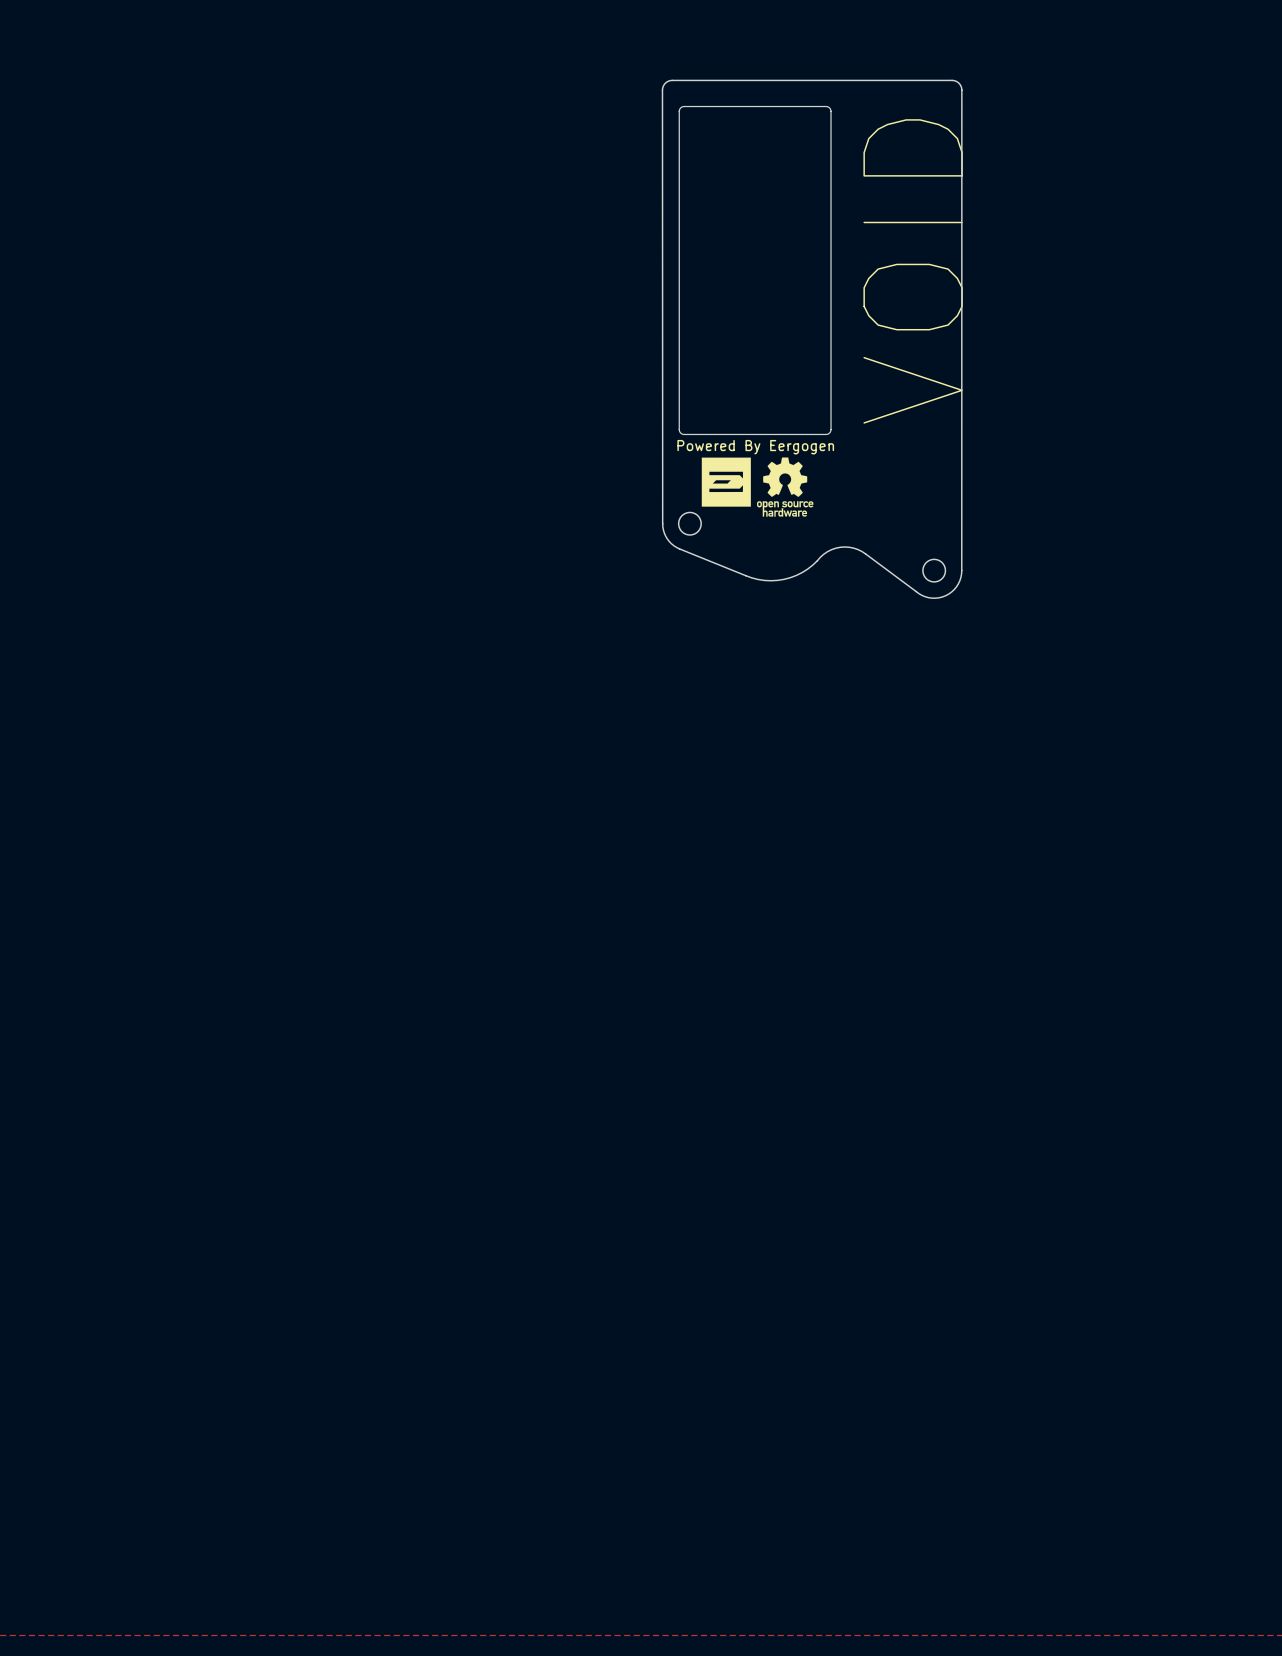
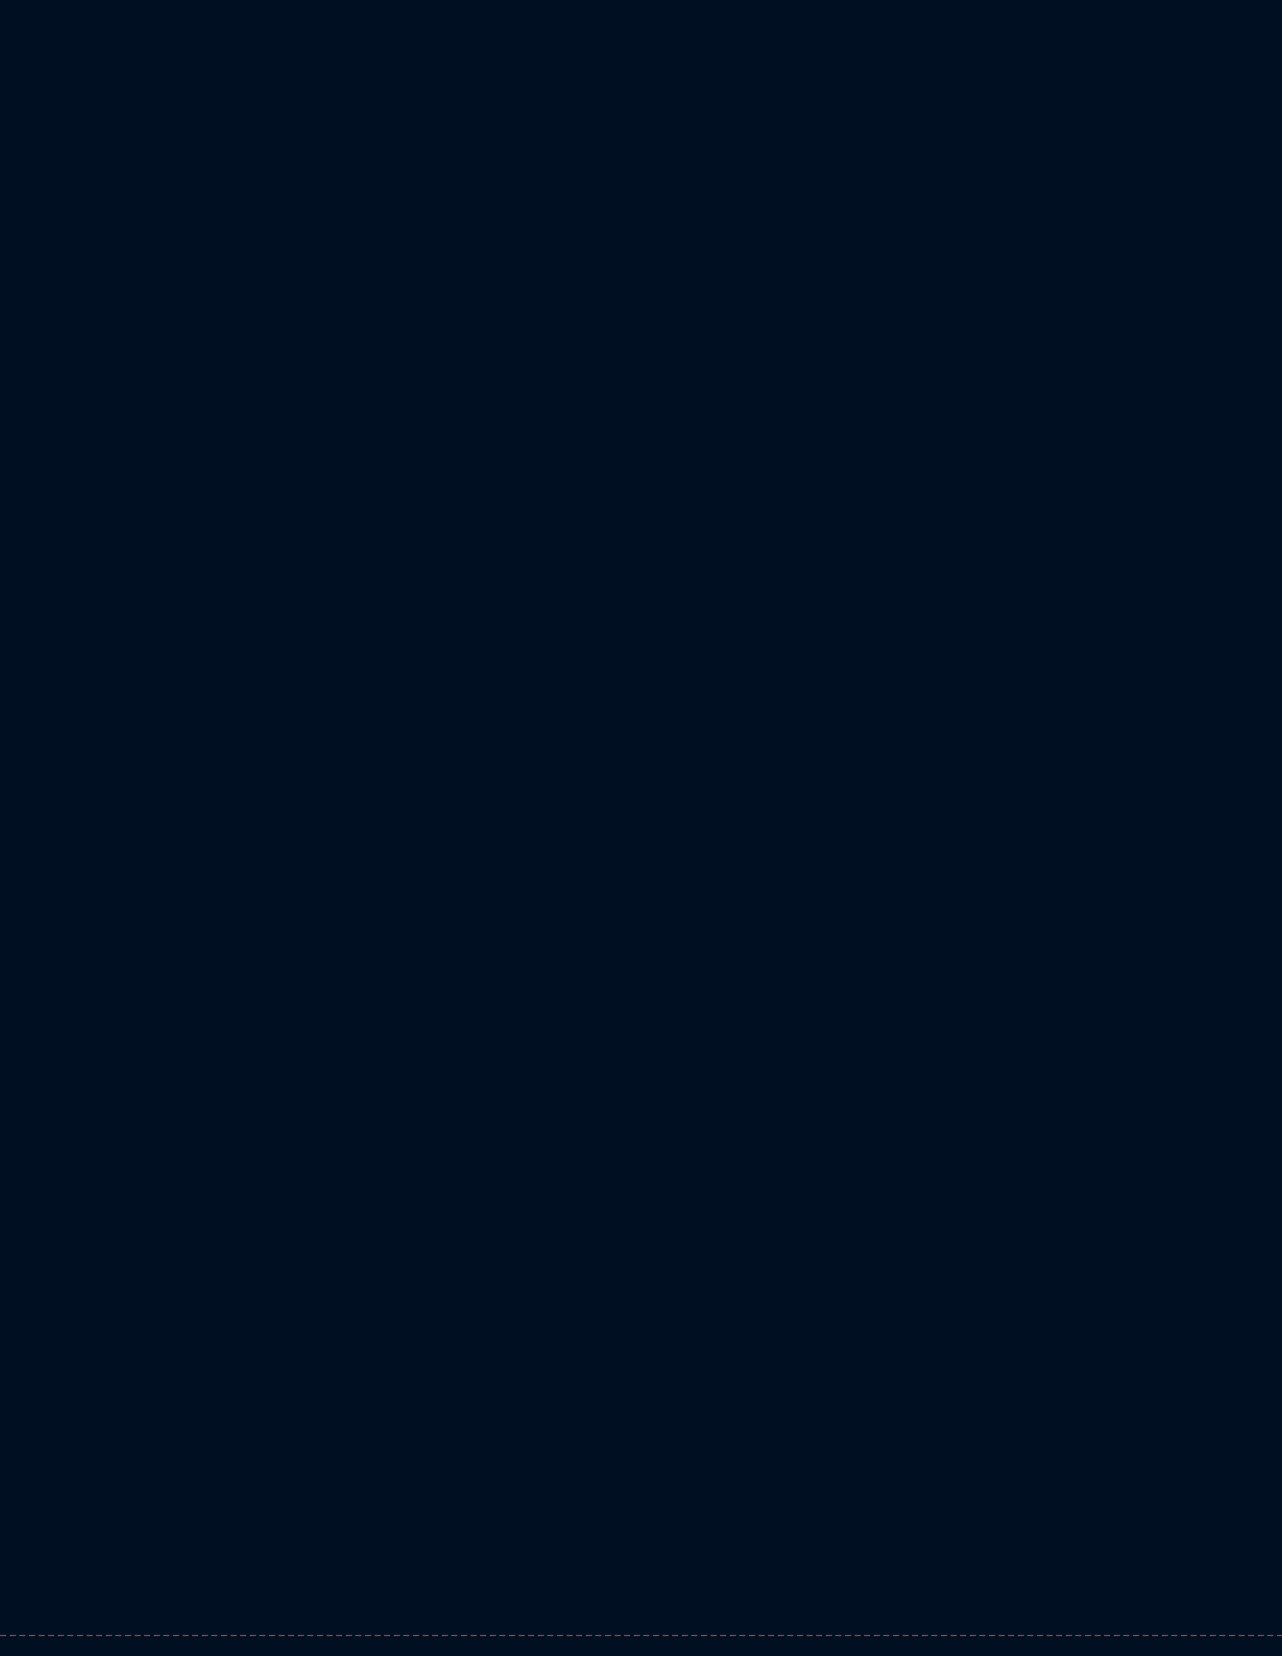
board edge: (672, 80) (952, 80) (957, 81) (960, 85) (961, 570) (956, 586) (945, 595) (935, 598) (922, 595) (865, 553) (853, 548) (844, 546) (831, 549) (807, 569) (790, 577) (764, 580) (745, 575) (679, 548) (671, 543) (665, 536) (662, 523) (662, 90) (665, 83) (672, 80) -> none
drawing: [679, 106, 832, 435] -> none
text: VOID (913, 271) -> none
text: Powered By Eergogen (755, 447) -> none
drawing: [701, 457, 814, 517] -> none
round board edge: [677, 511, 702, 536] -> none
round board edge: [922, 558, 947, 583] -> none

